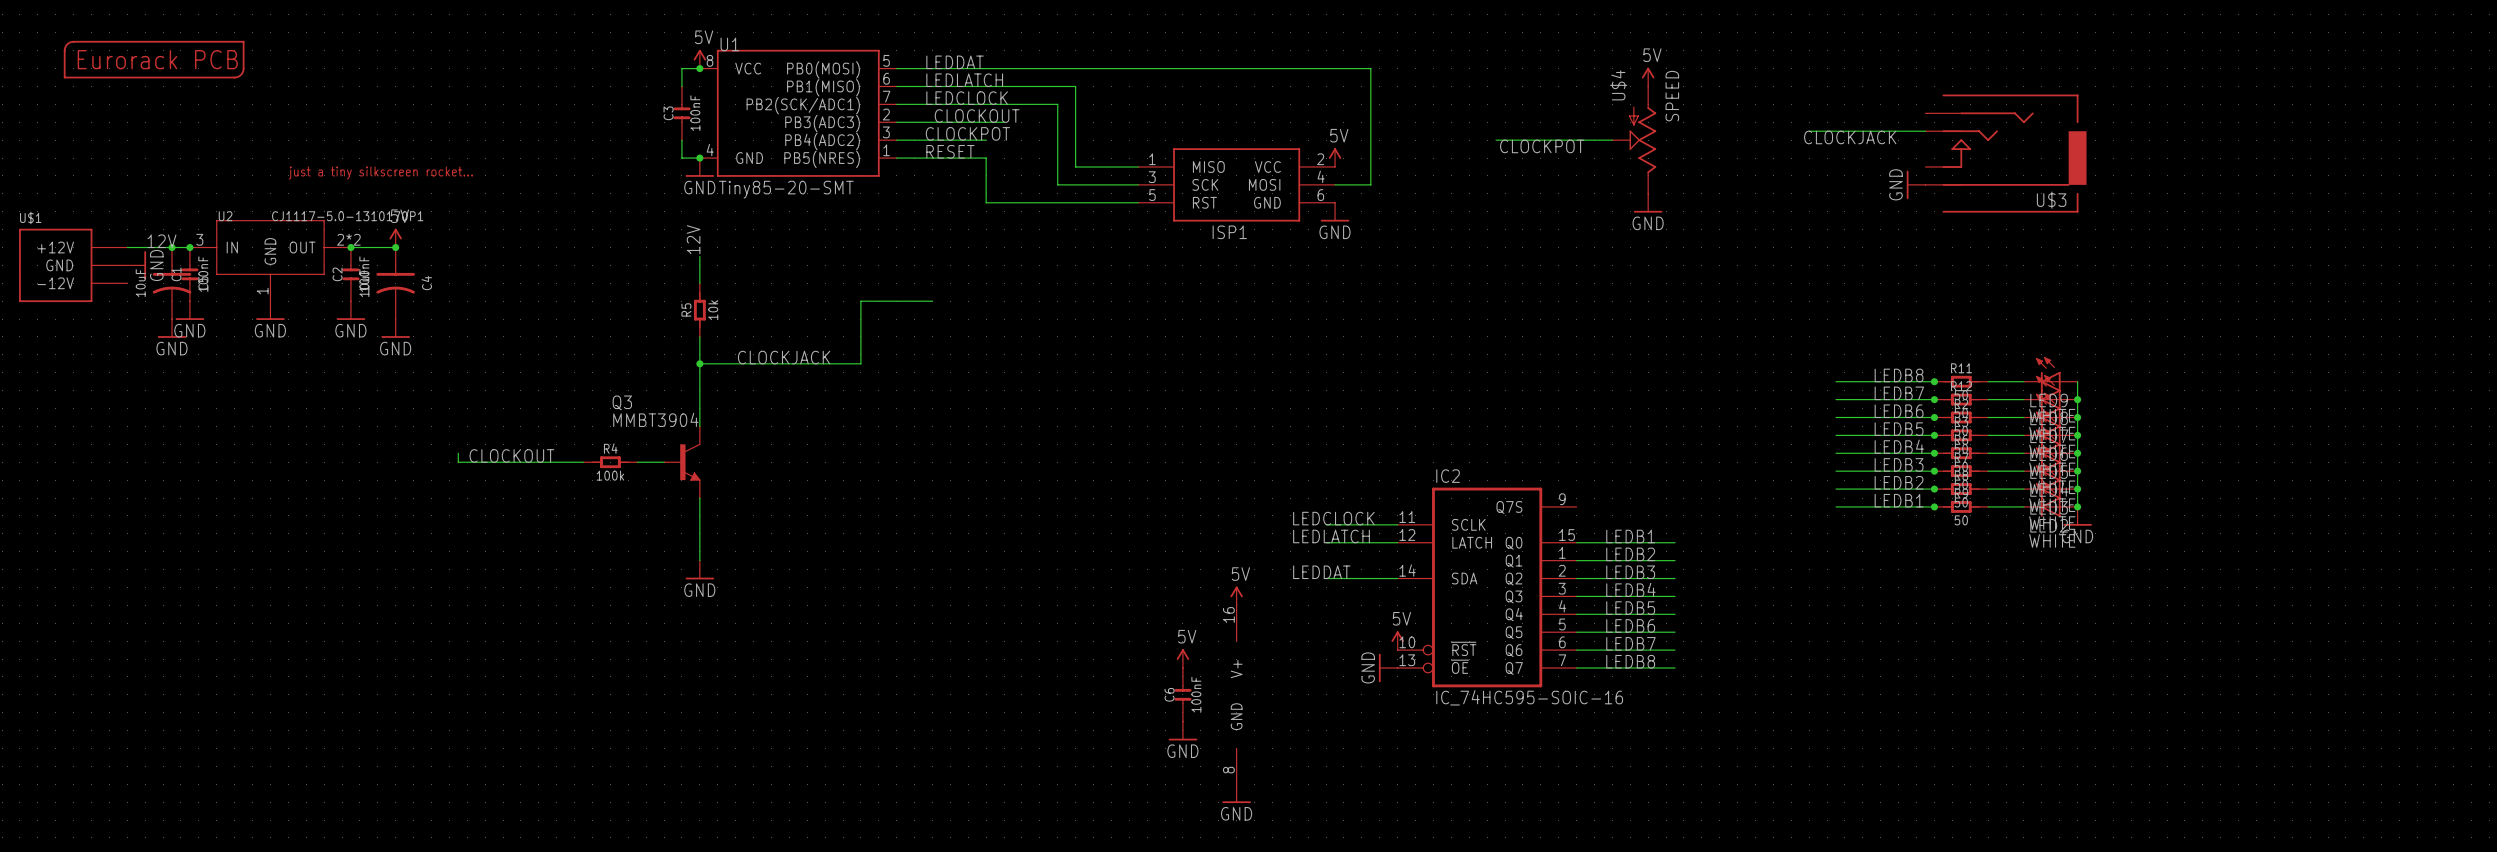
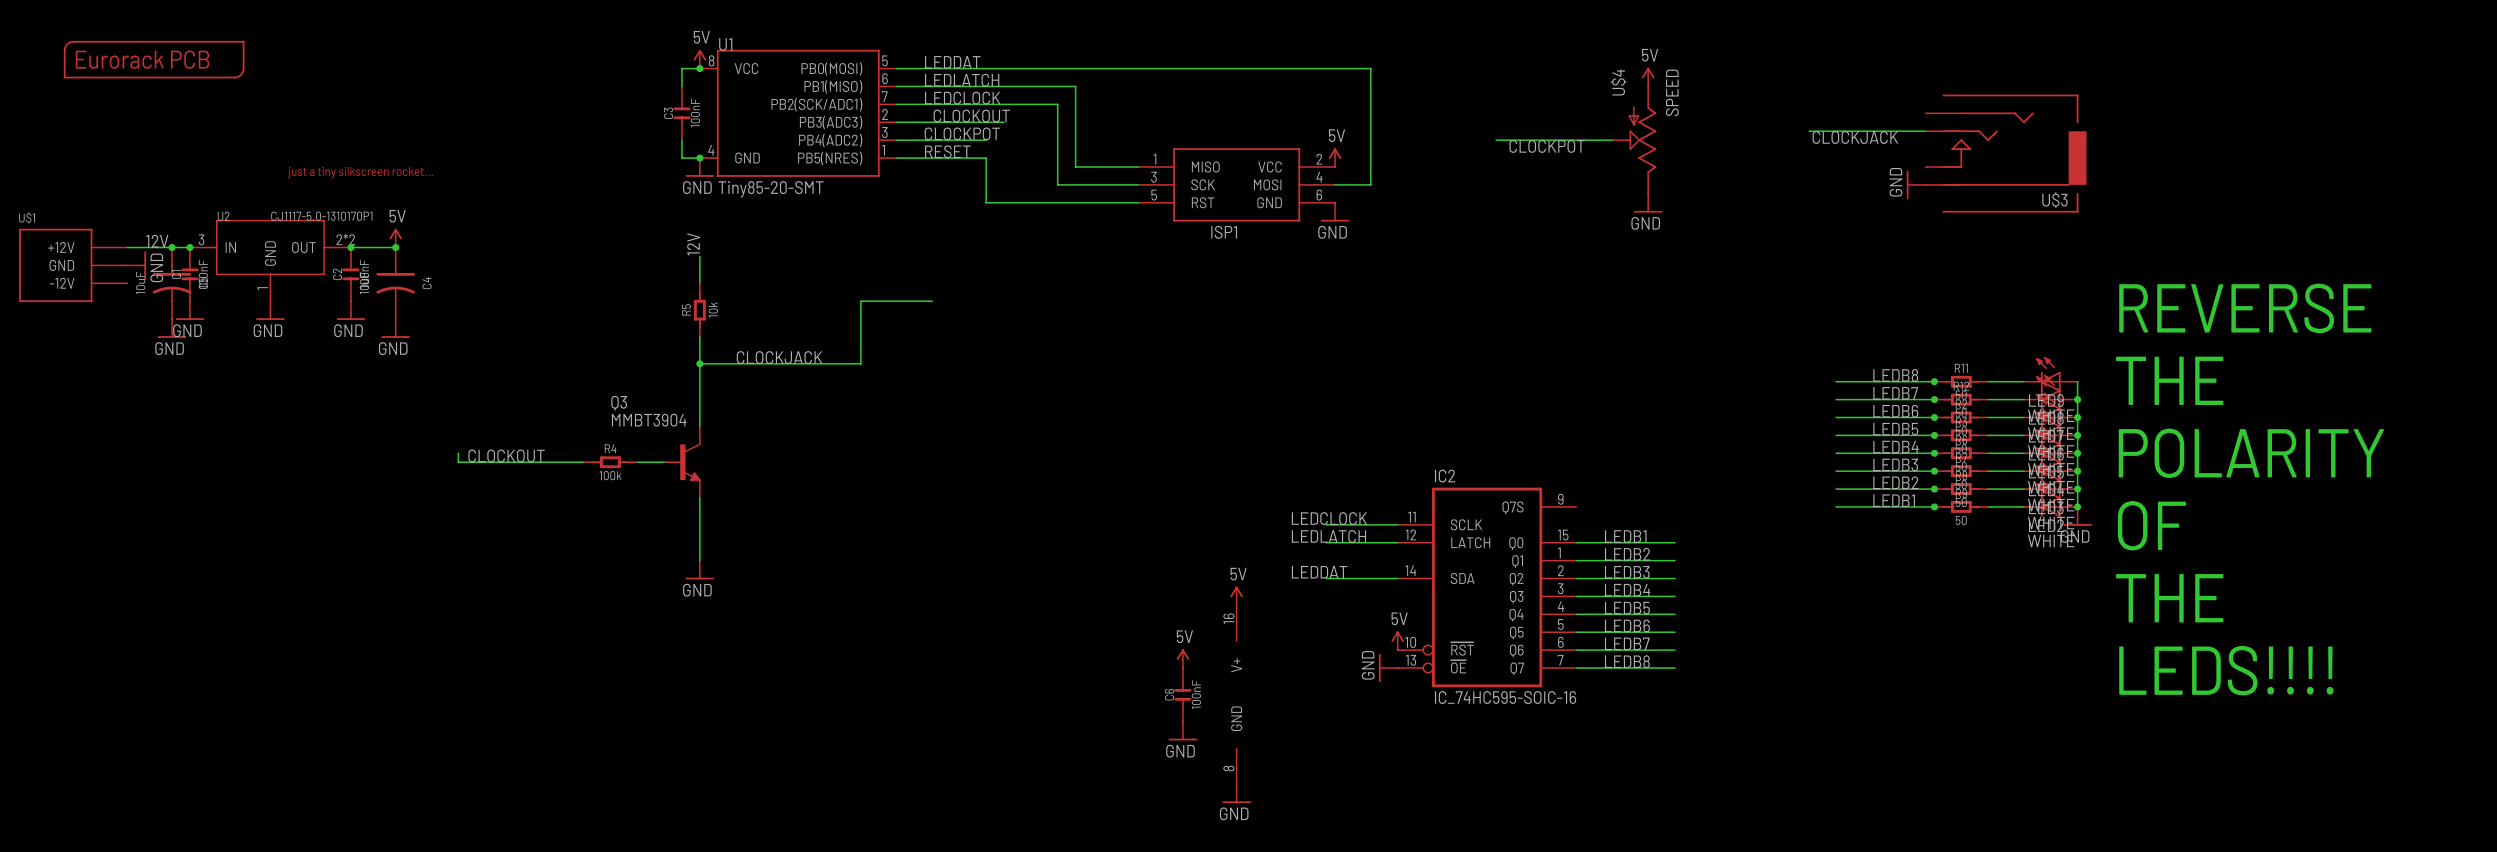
text: none -> REVERSE (2245, 308)
text: none -> THE (2169, 380)
text: none -> POLARITY (2251, 453)
text: none -> OF (2151, 525)
text: none -> THE (2169, 598)
text: none -> LEDS!!!! (2226, 670)

